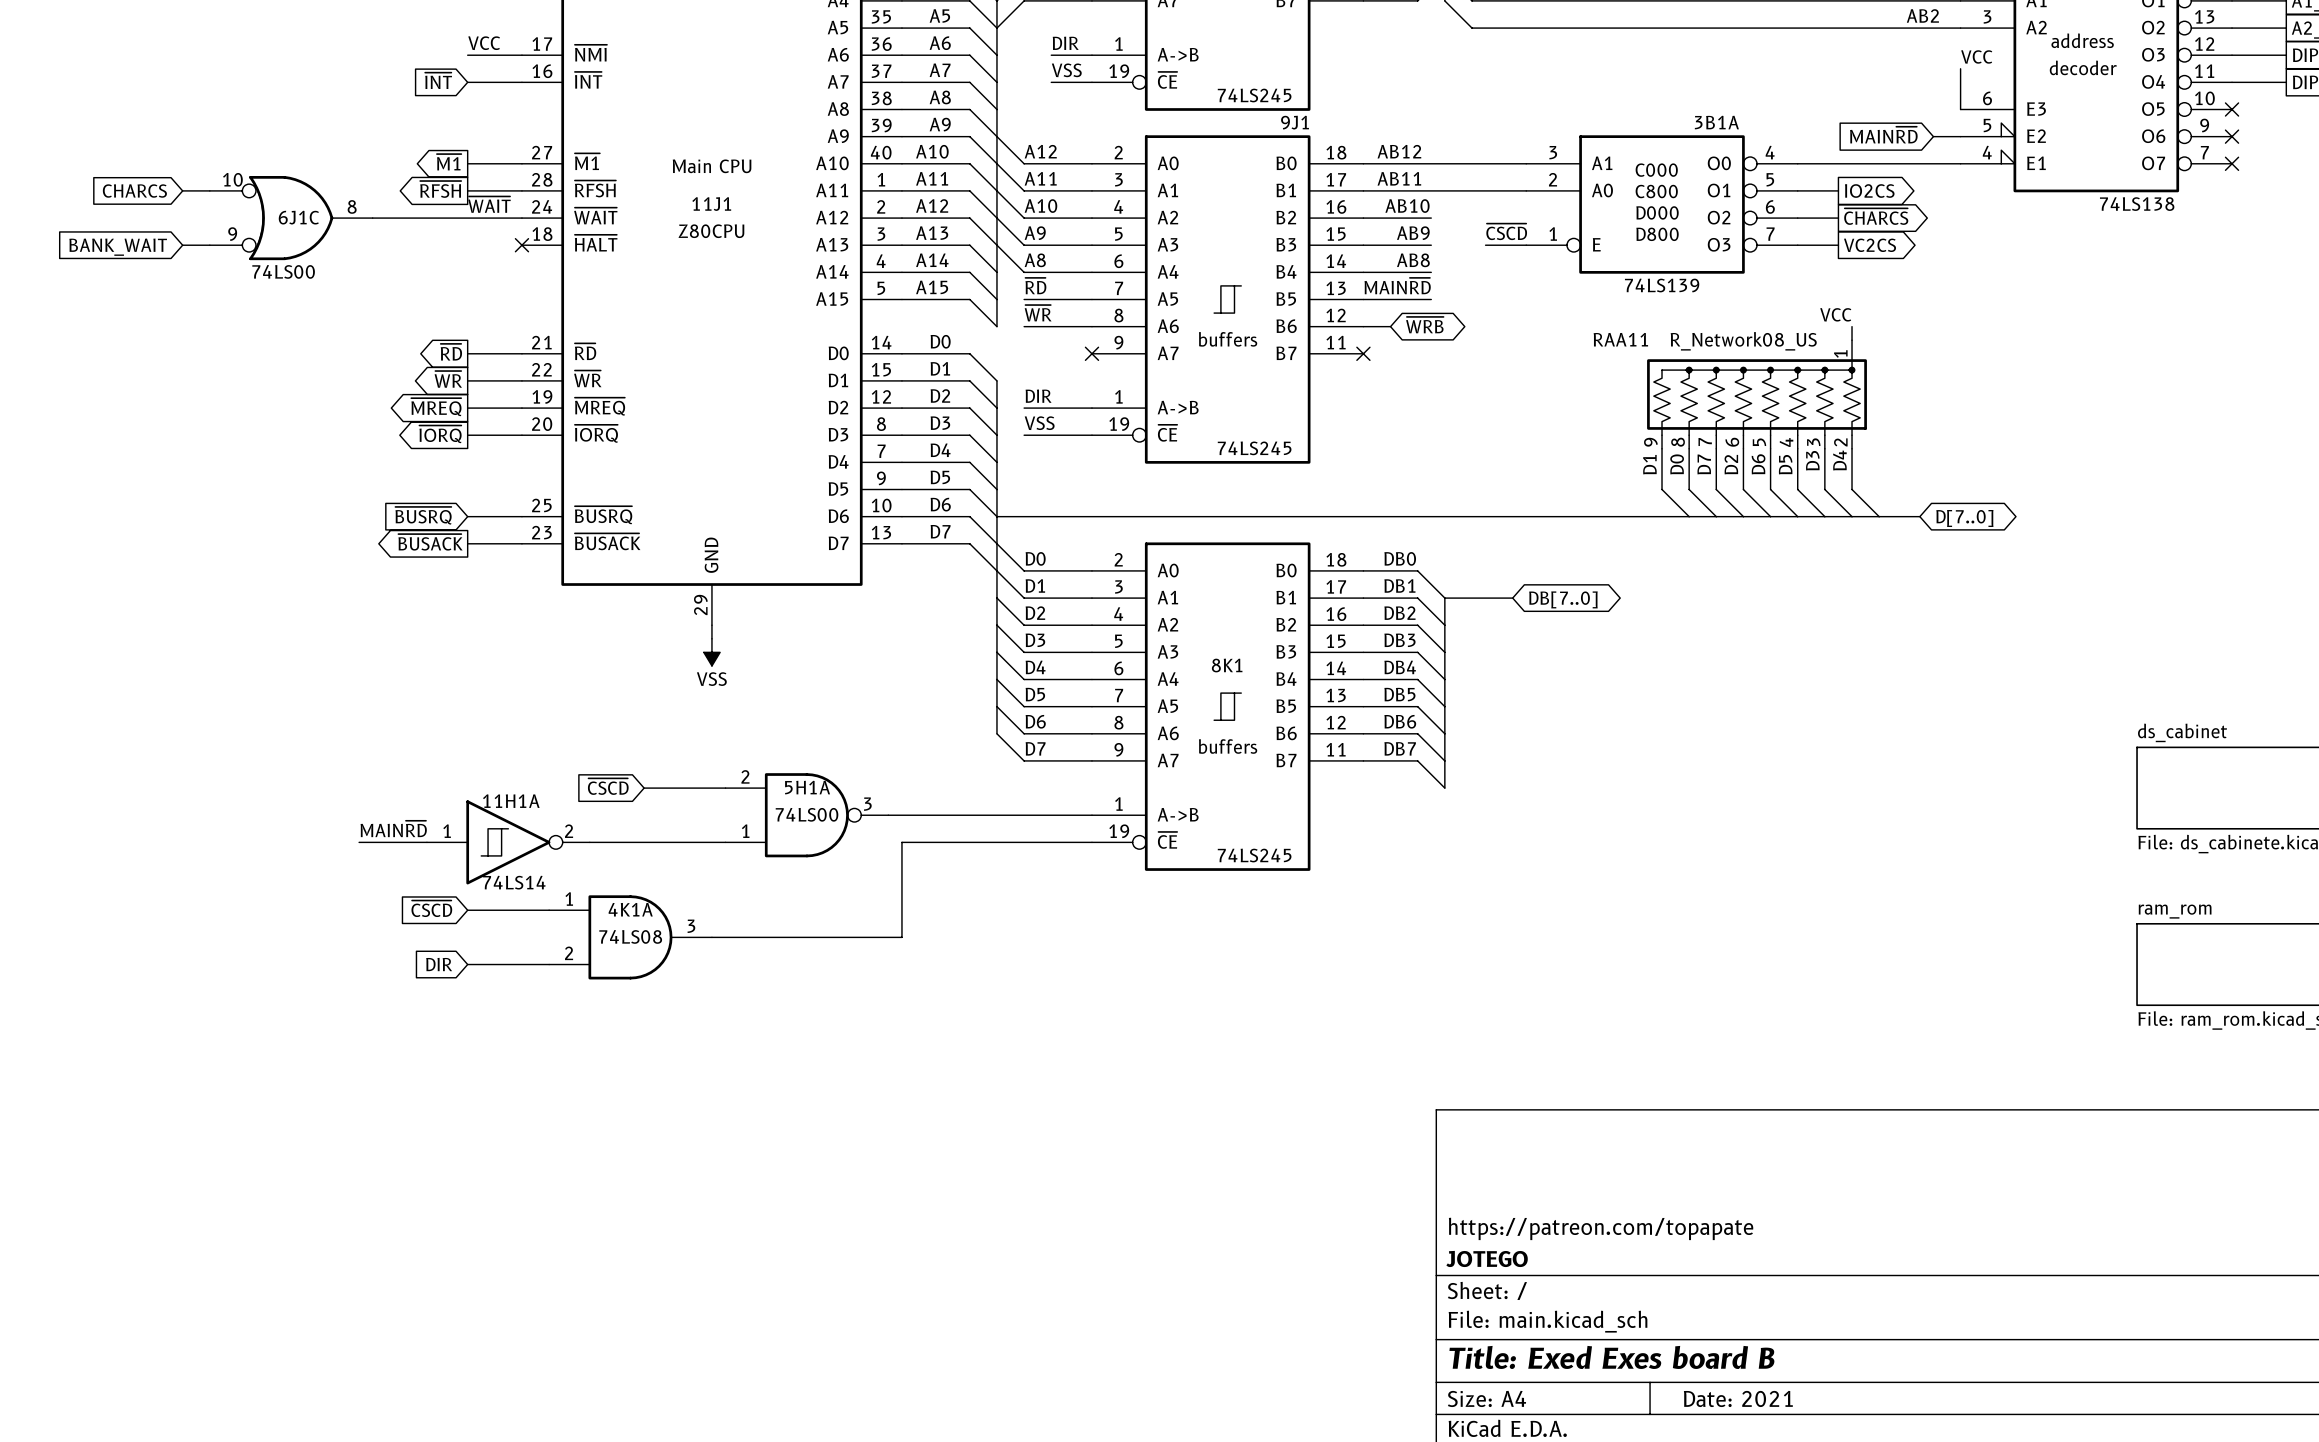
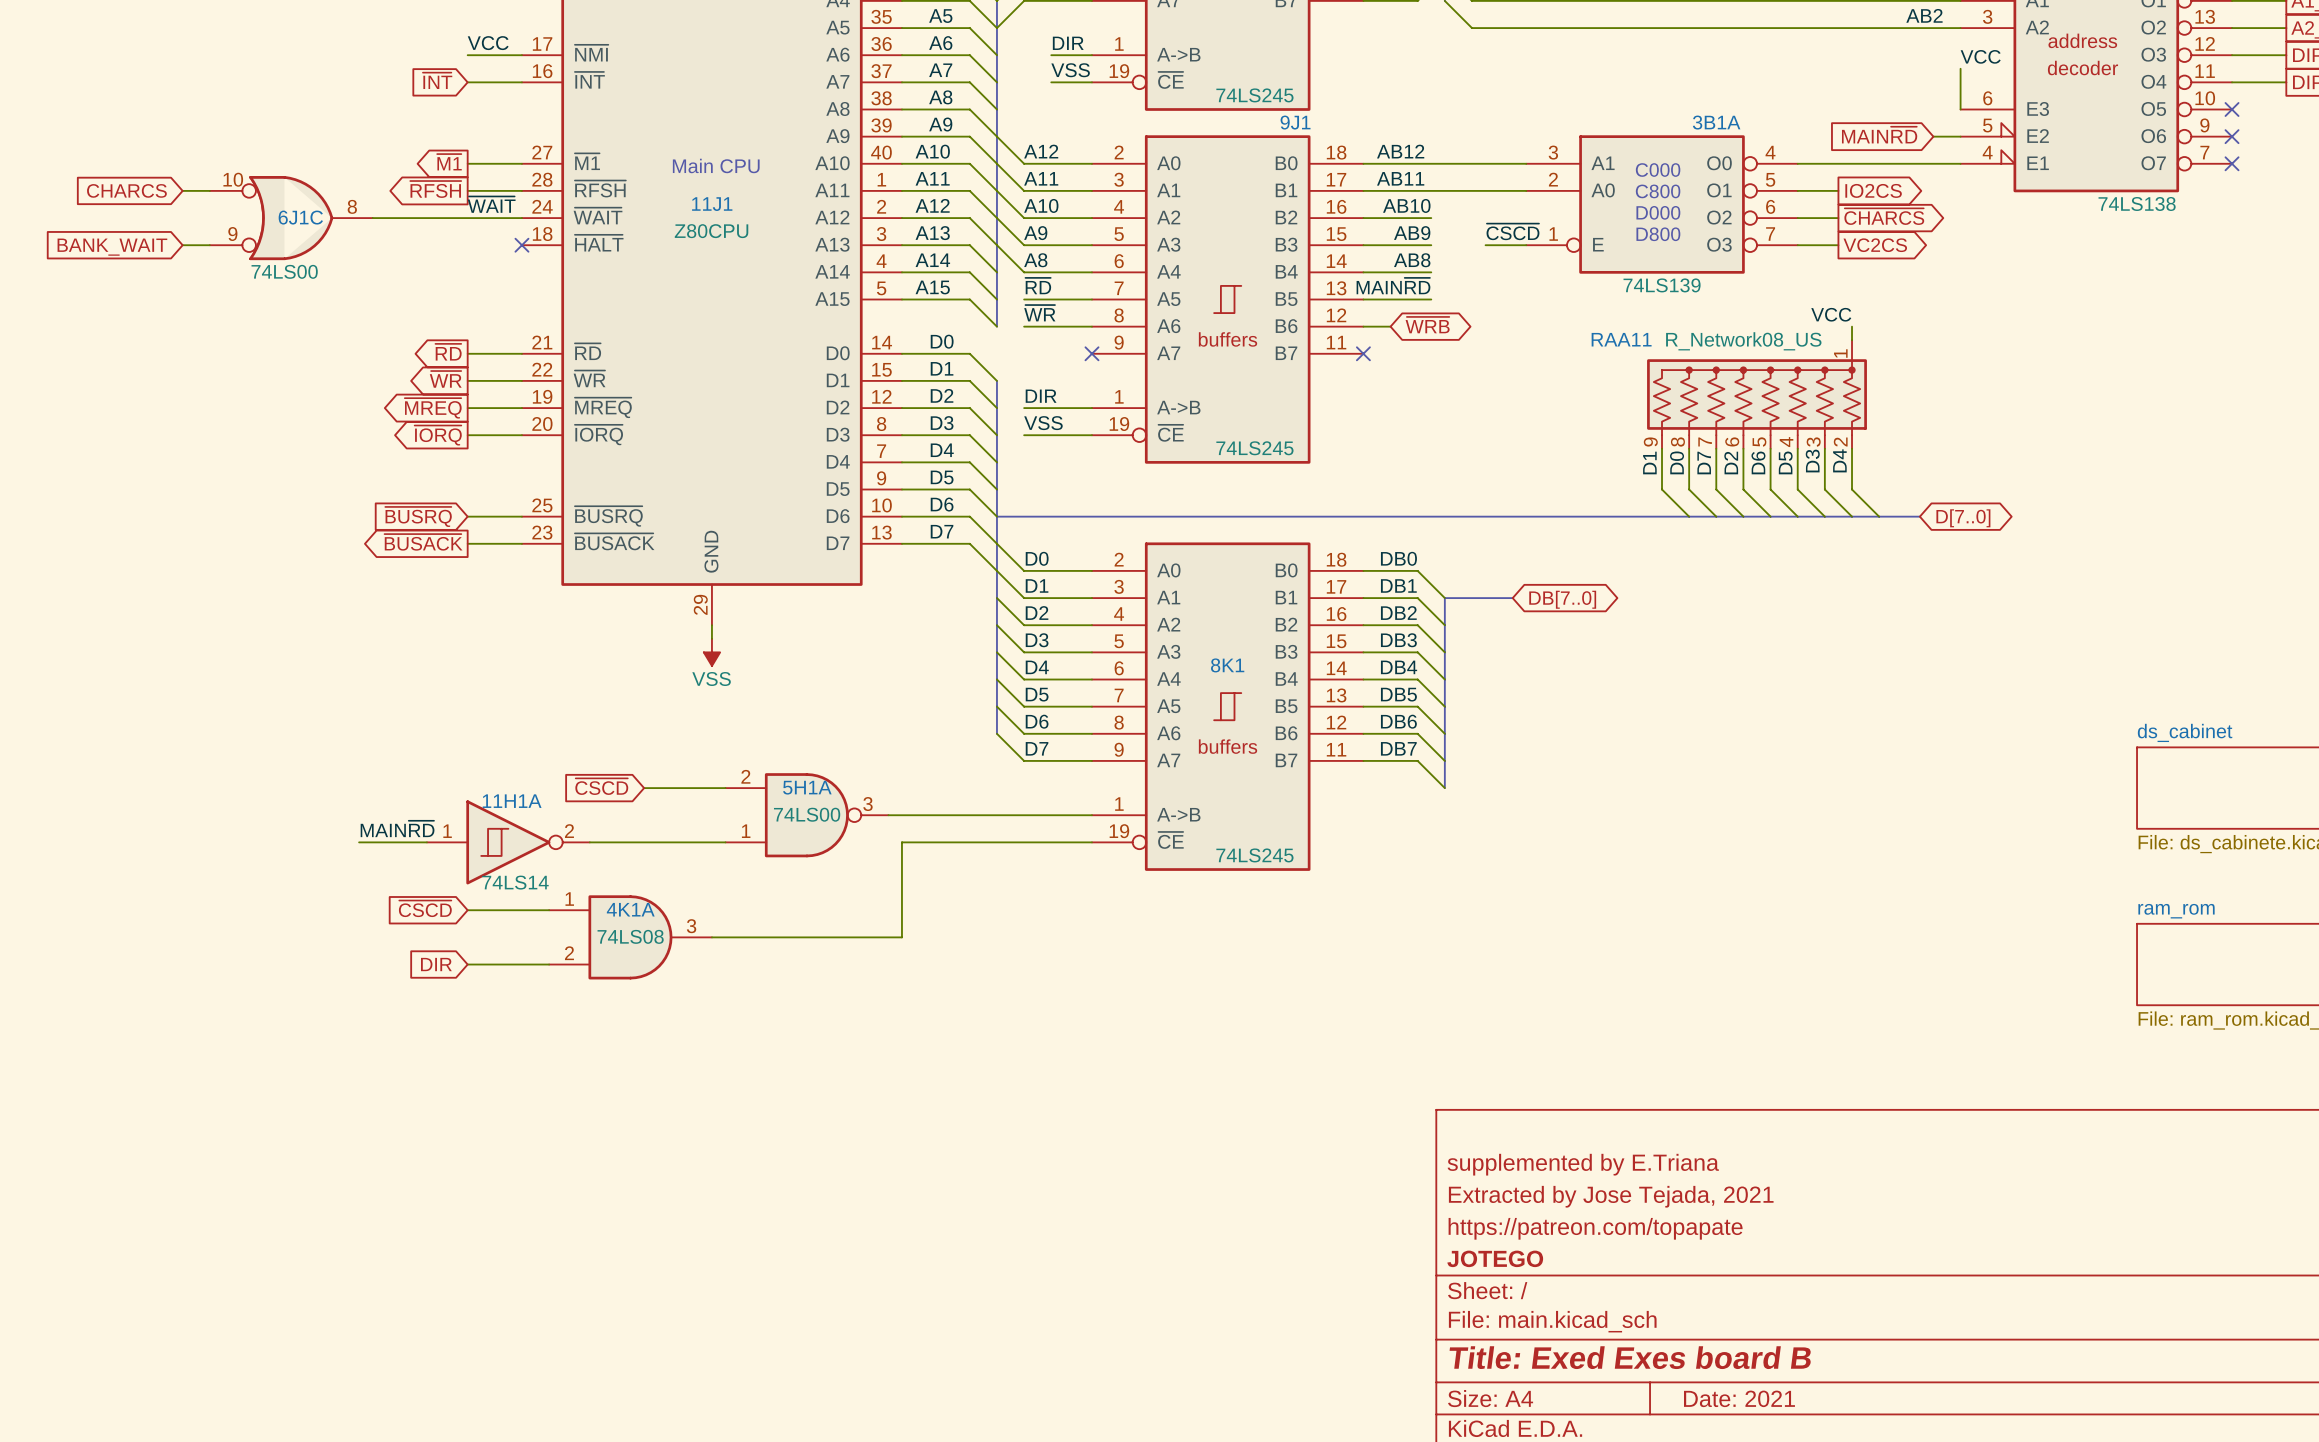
title block: none -> supplemented by E.Triana (1583, 1164)
title block: none -> Extracted by Jose Tejada, 2021 (1611, 1196)

